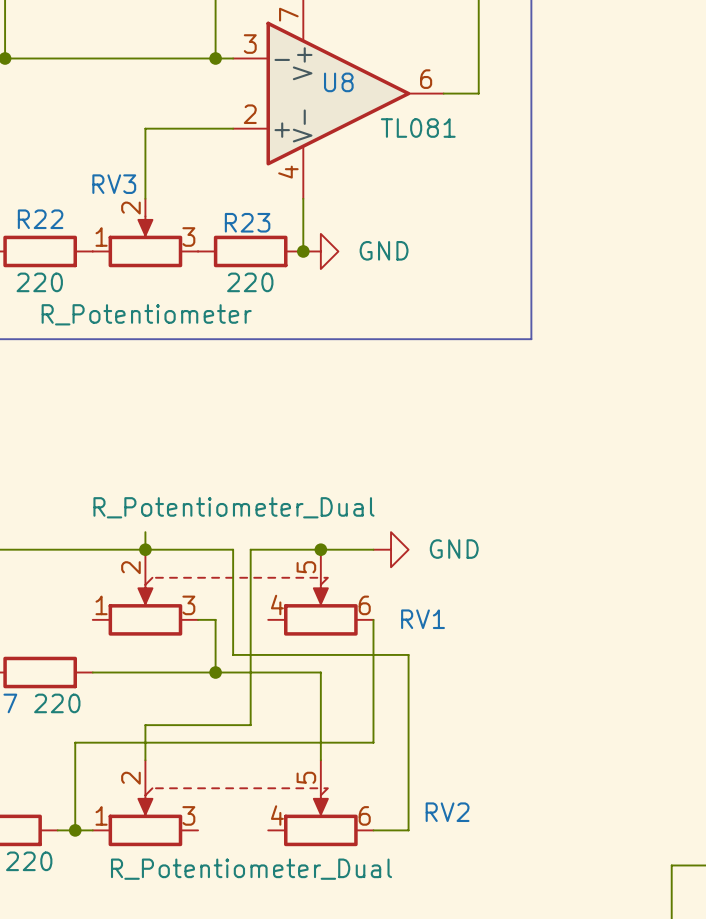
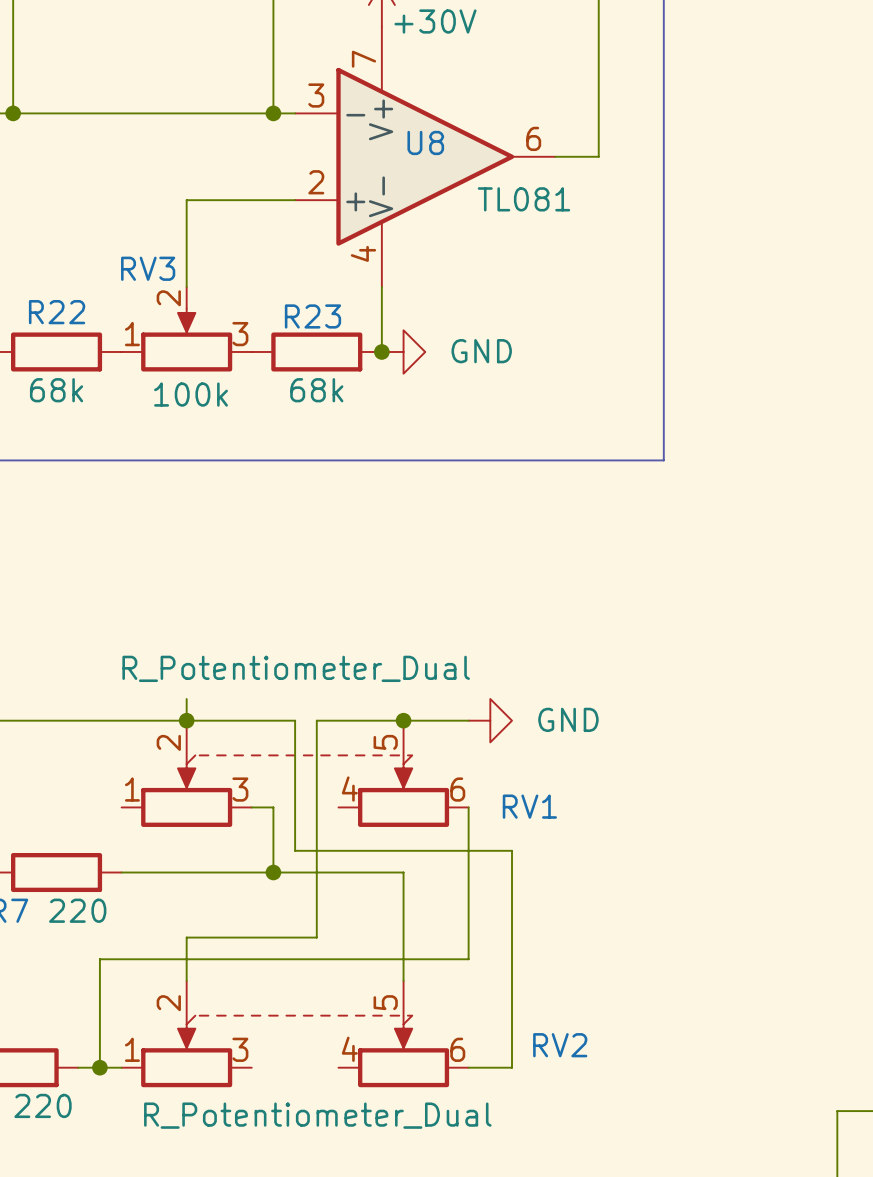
R22 value: 220 (39, 282) -> 68k (56, 390)
R23 value: 220 (250, 282) -> 68k (316, 390)
RV3 value: R_Potentiometer (146, 314) -> 100k (191, 394)

